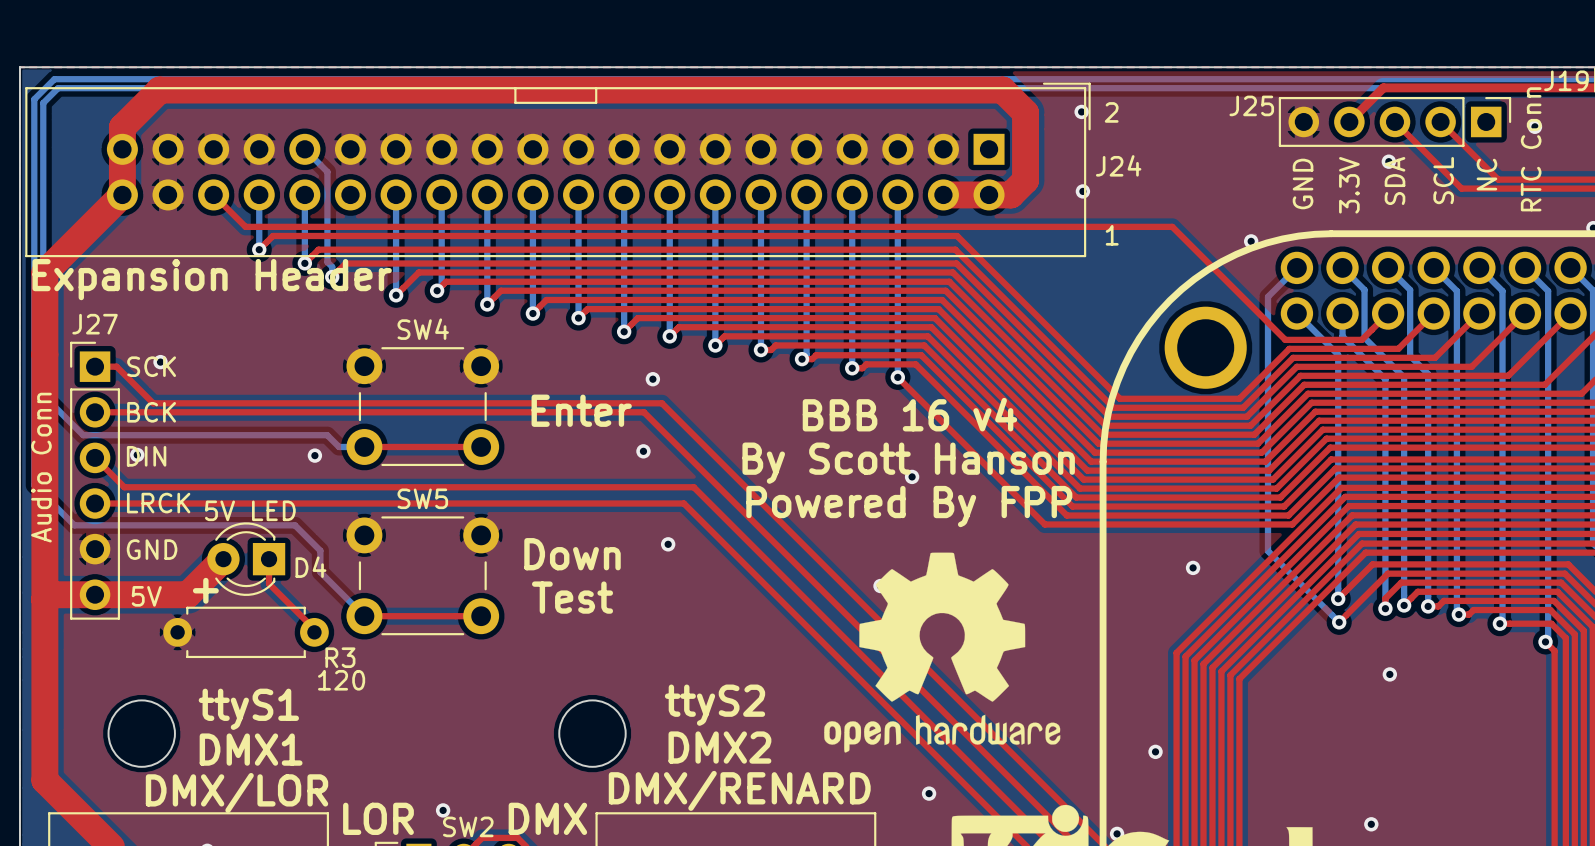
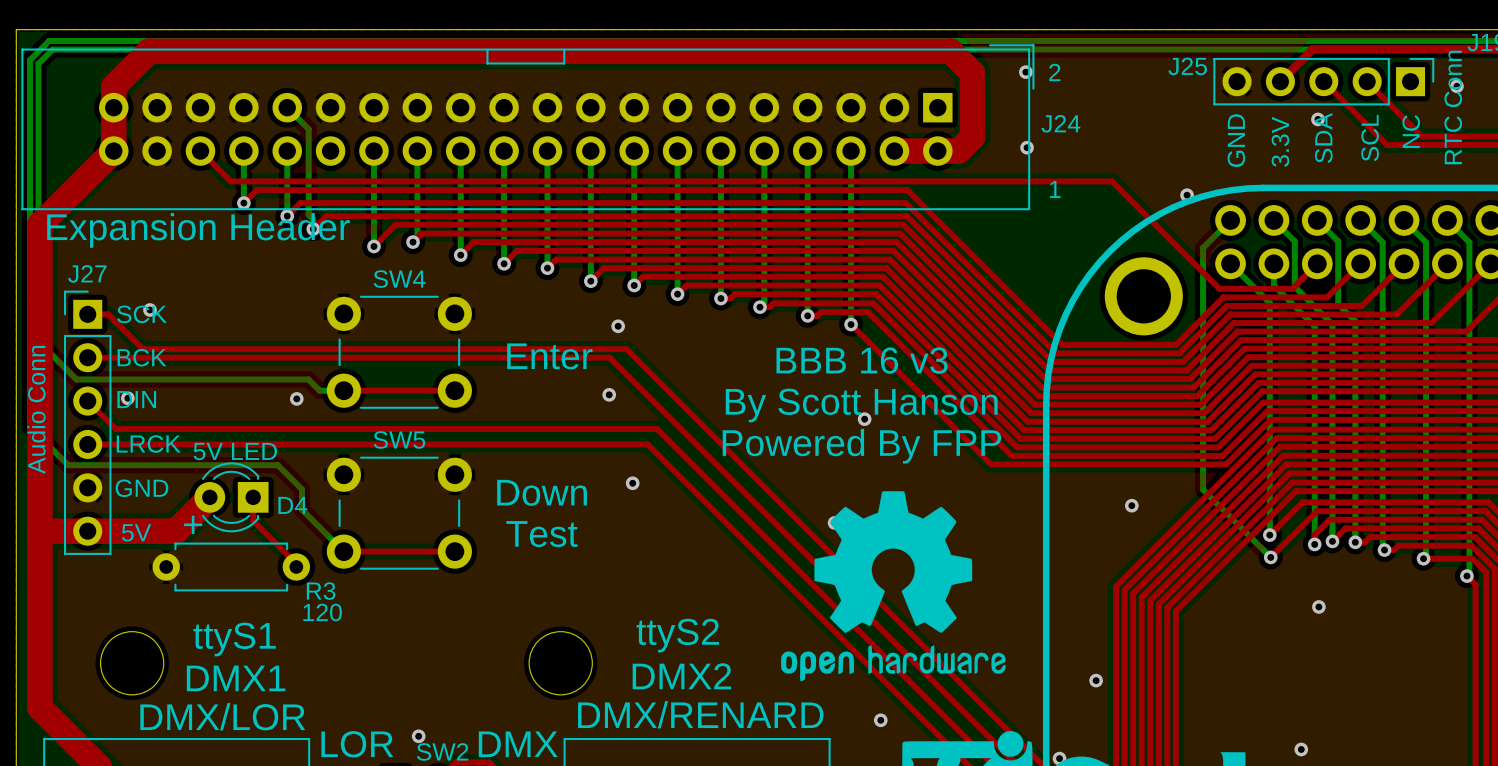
text: BBB 16 v4 (909, 414) -> BBB 16 v3 (862, 360)

